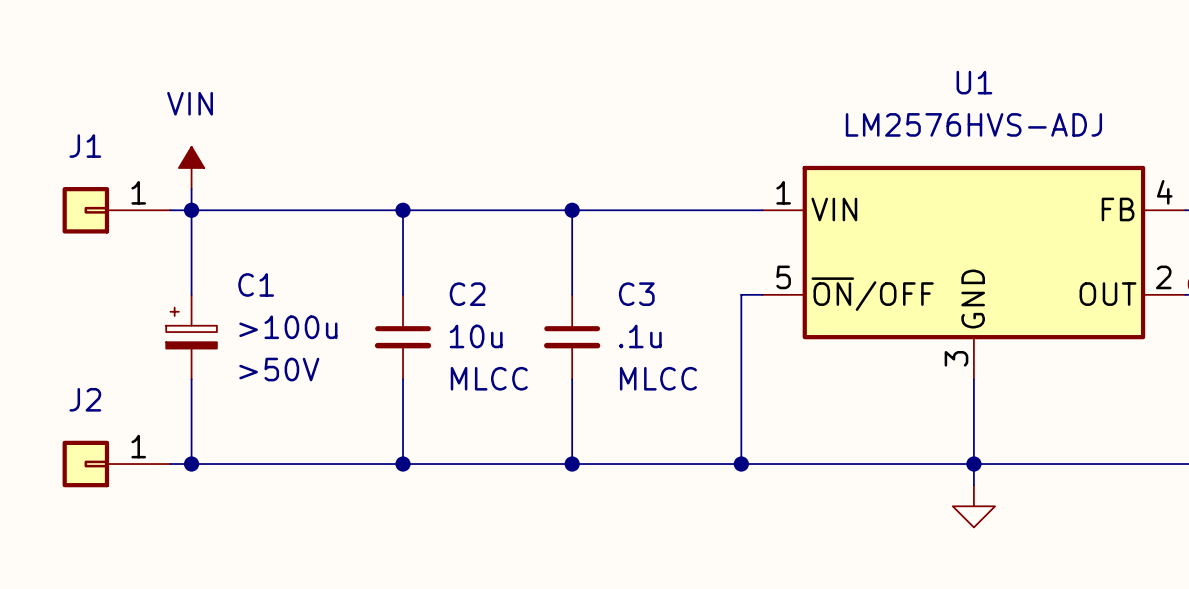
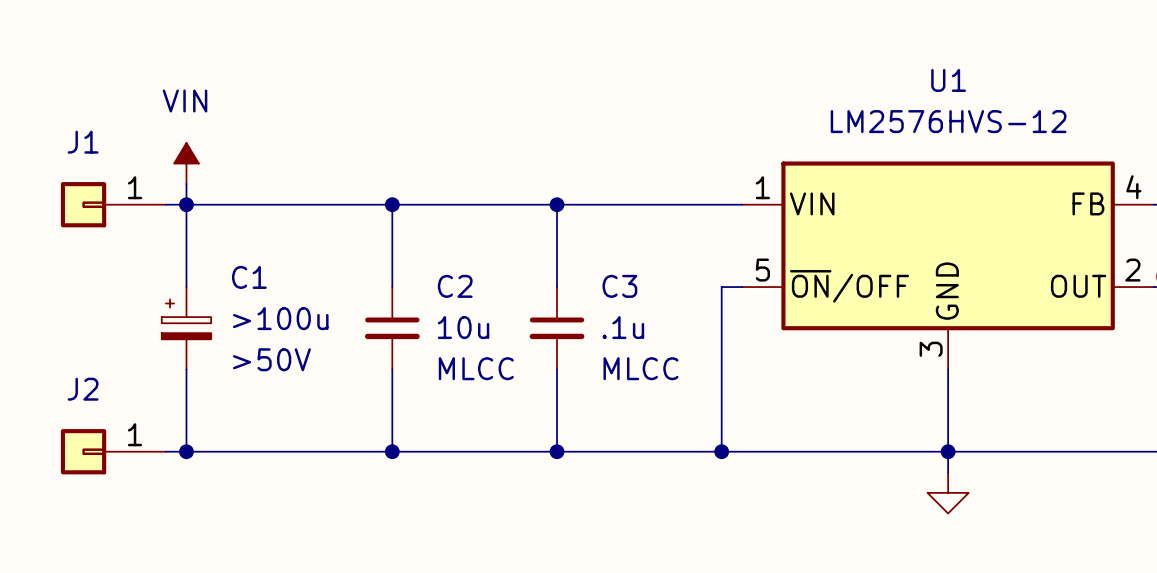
U1 value: LM2576HVS-ADJ (973, 124) -> LM2576HVS-12 (948, 121)

